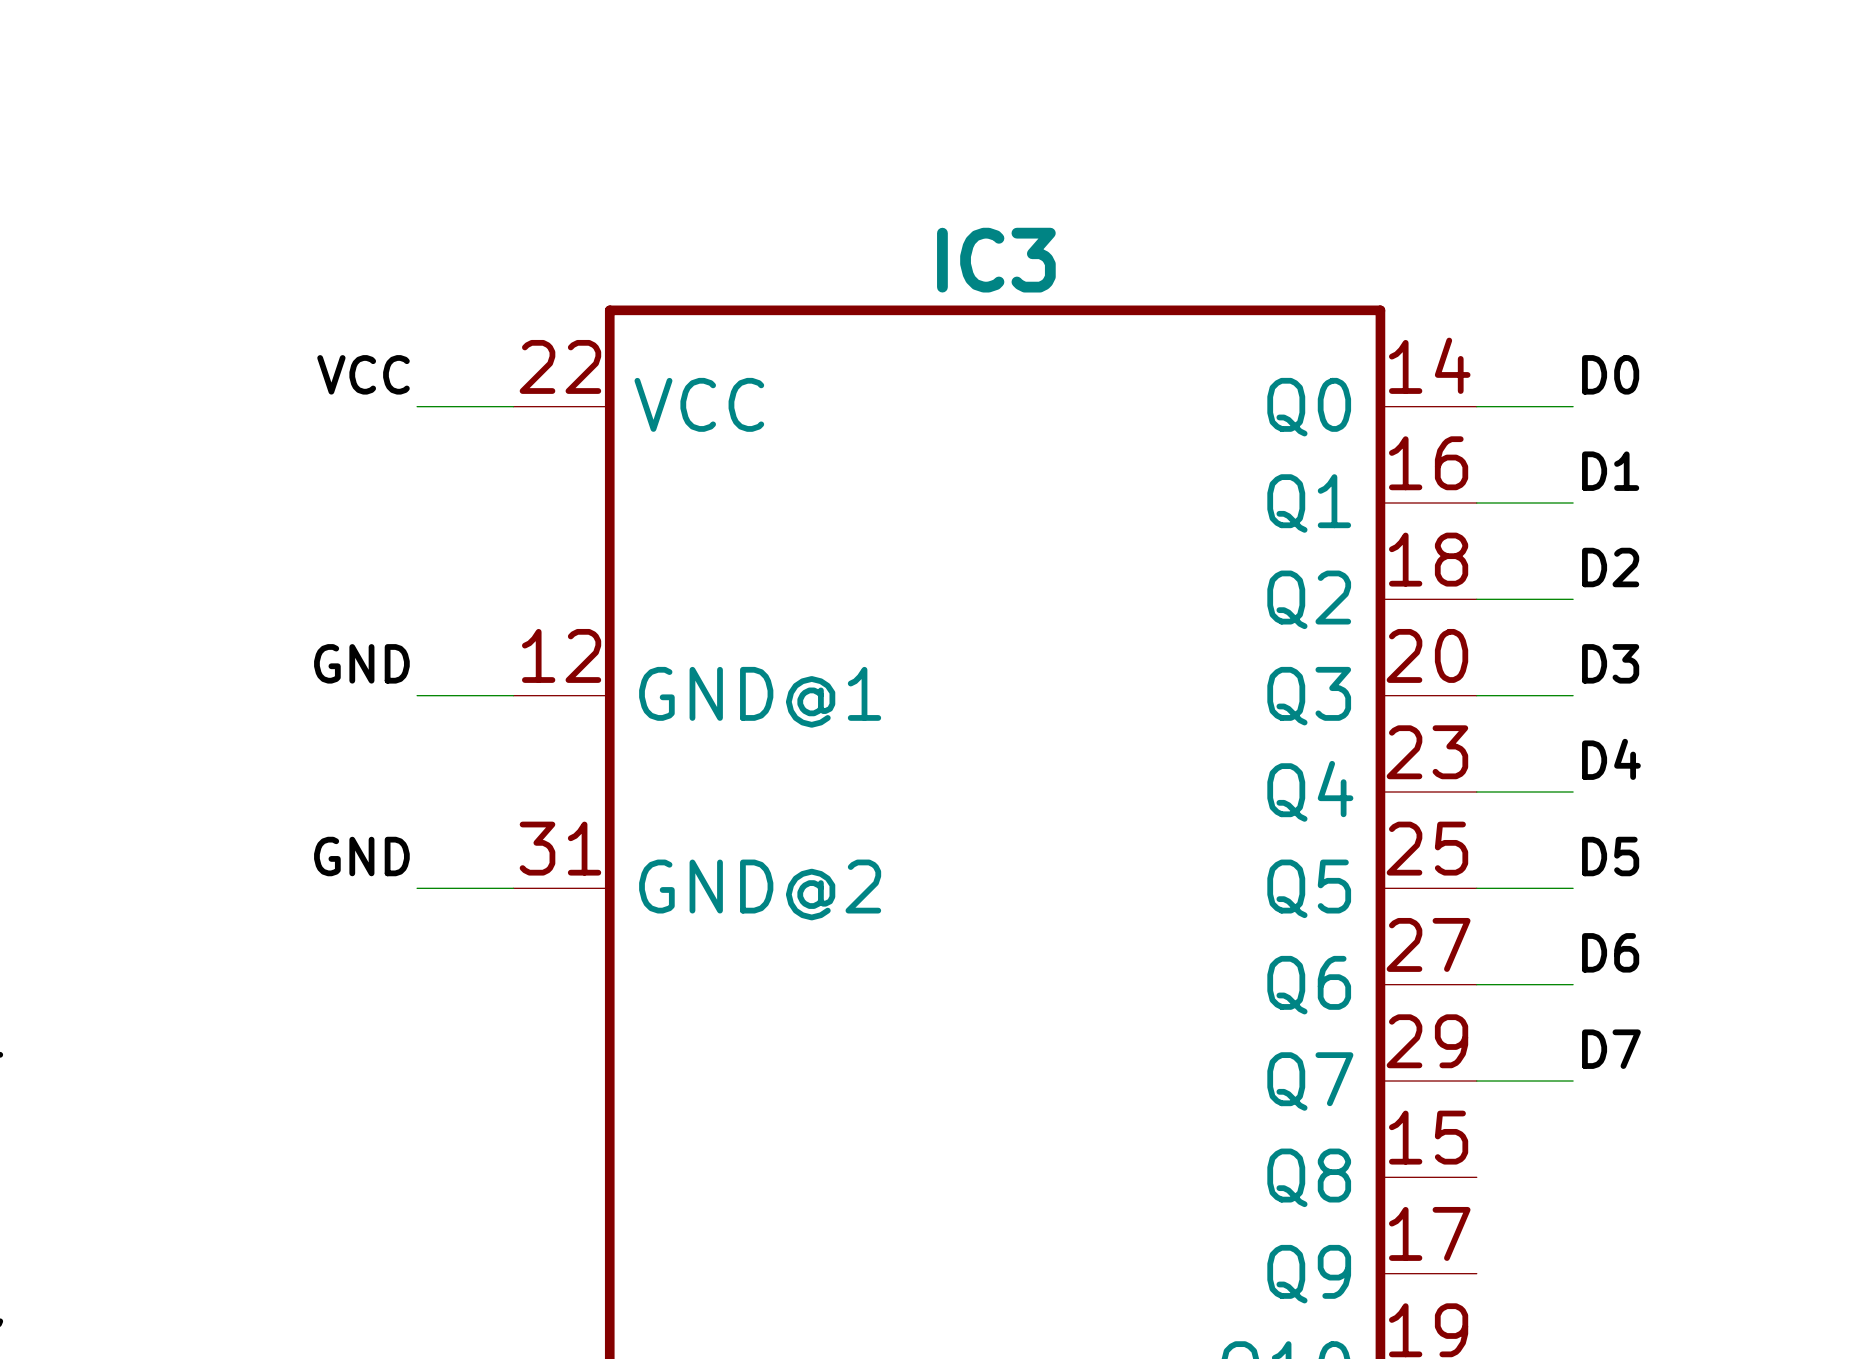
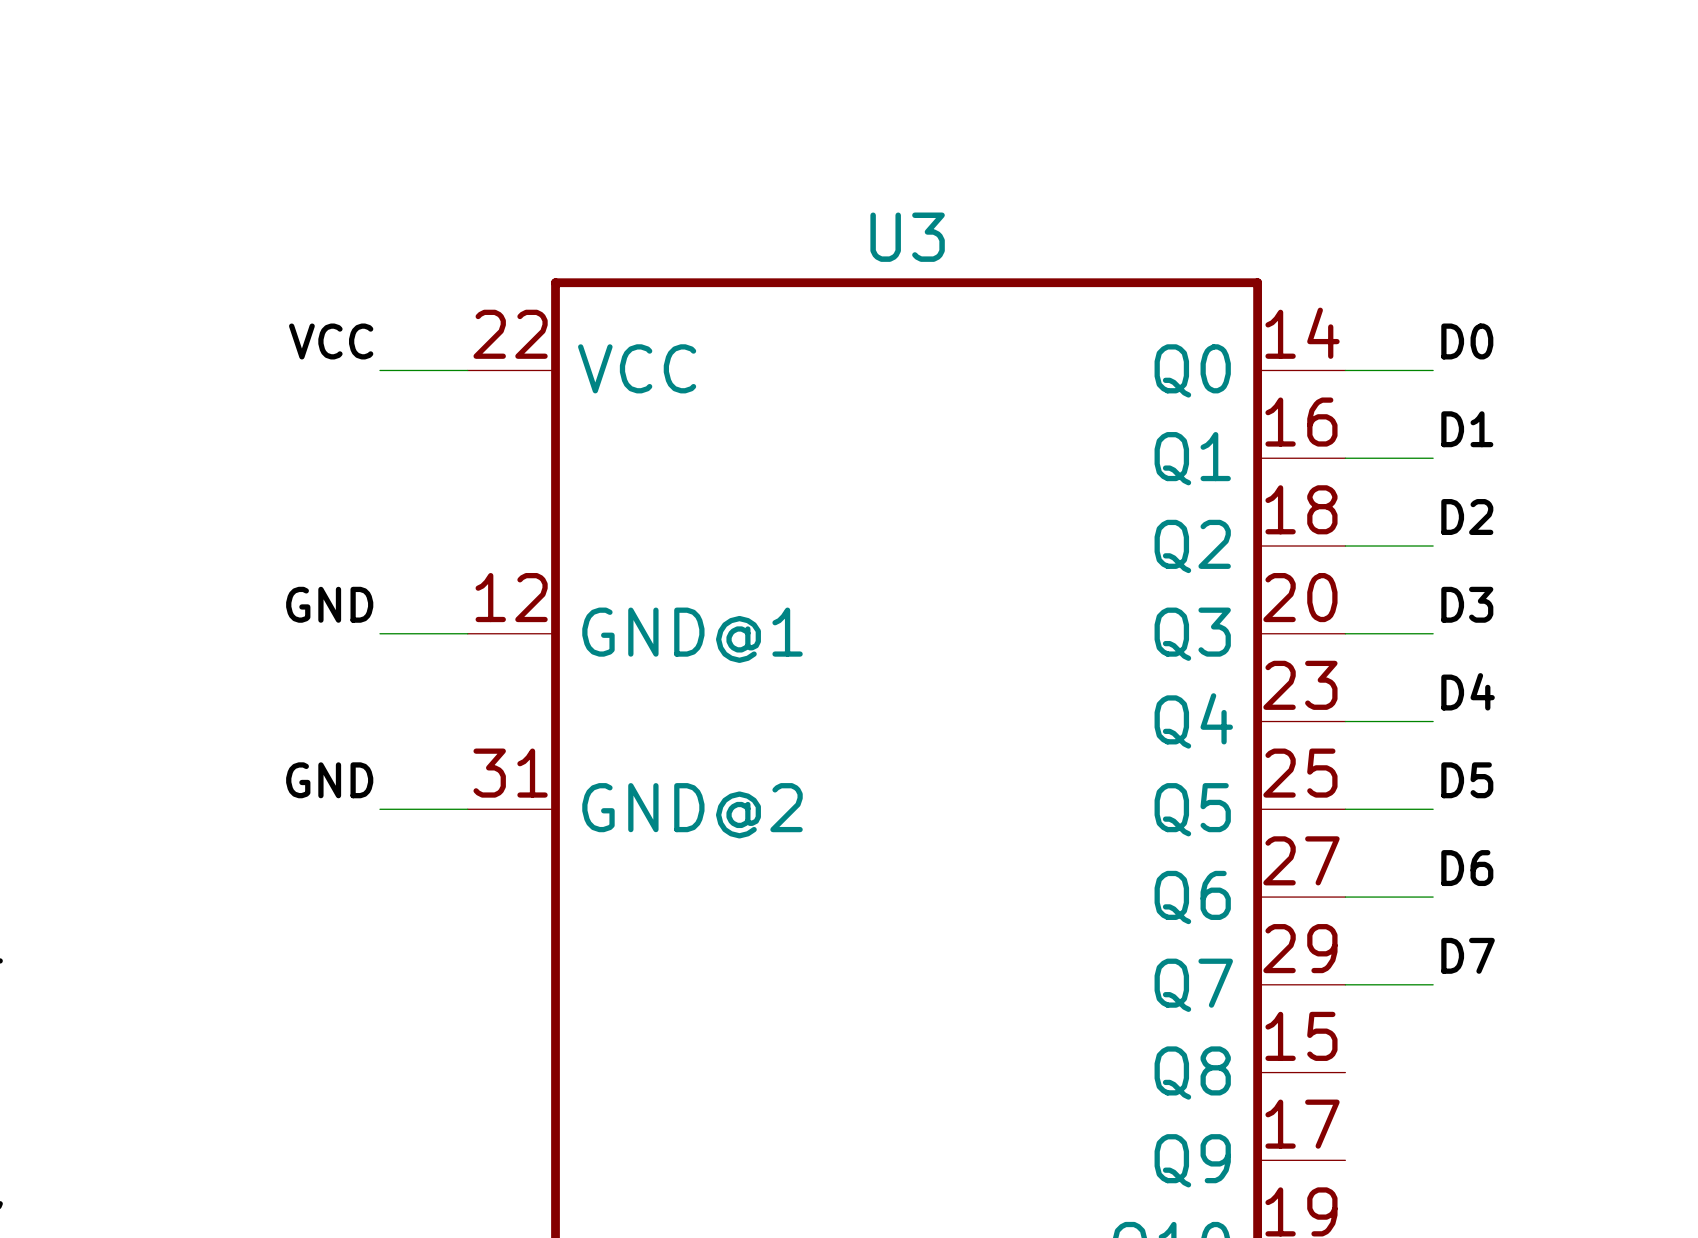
IC3 name: IC3 (996, 260) -> U3 (907, 237)

